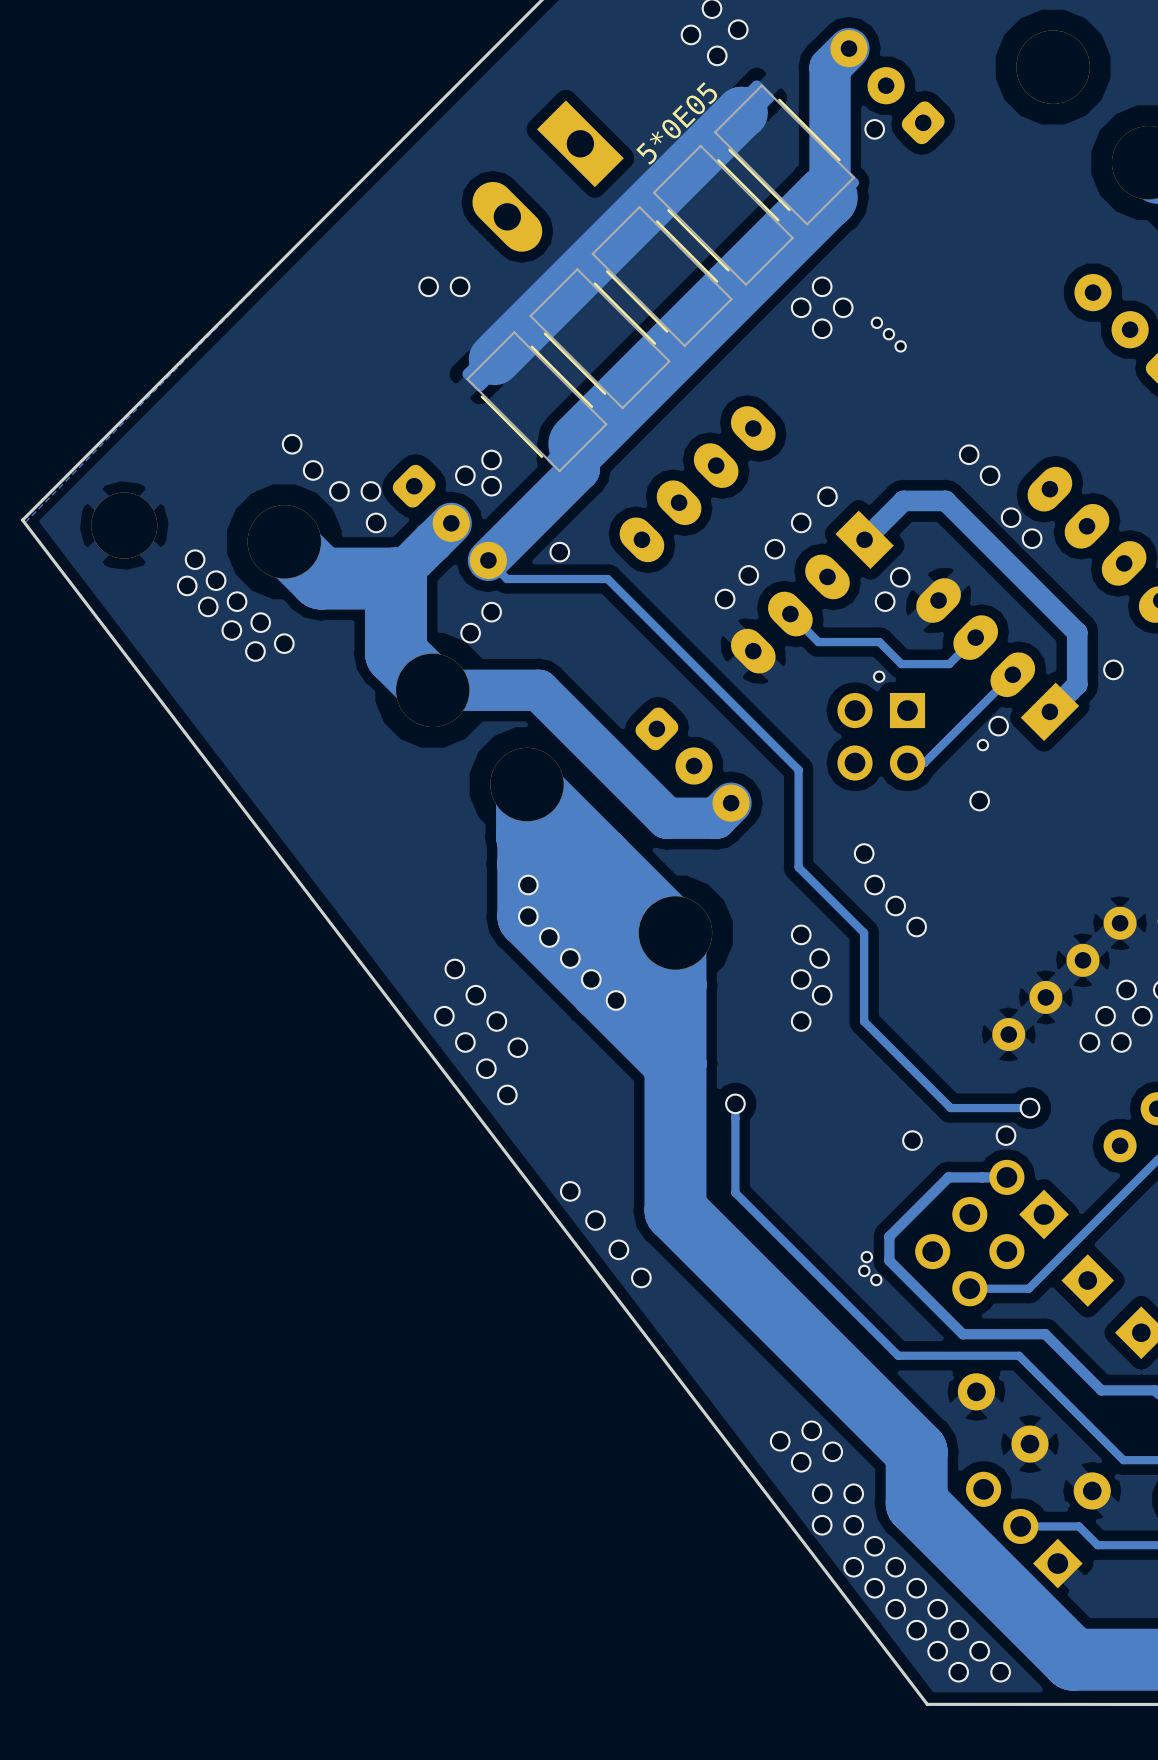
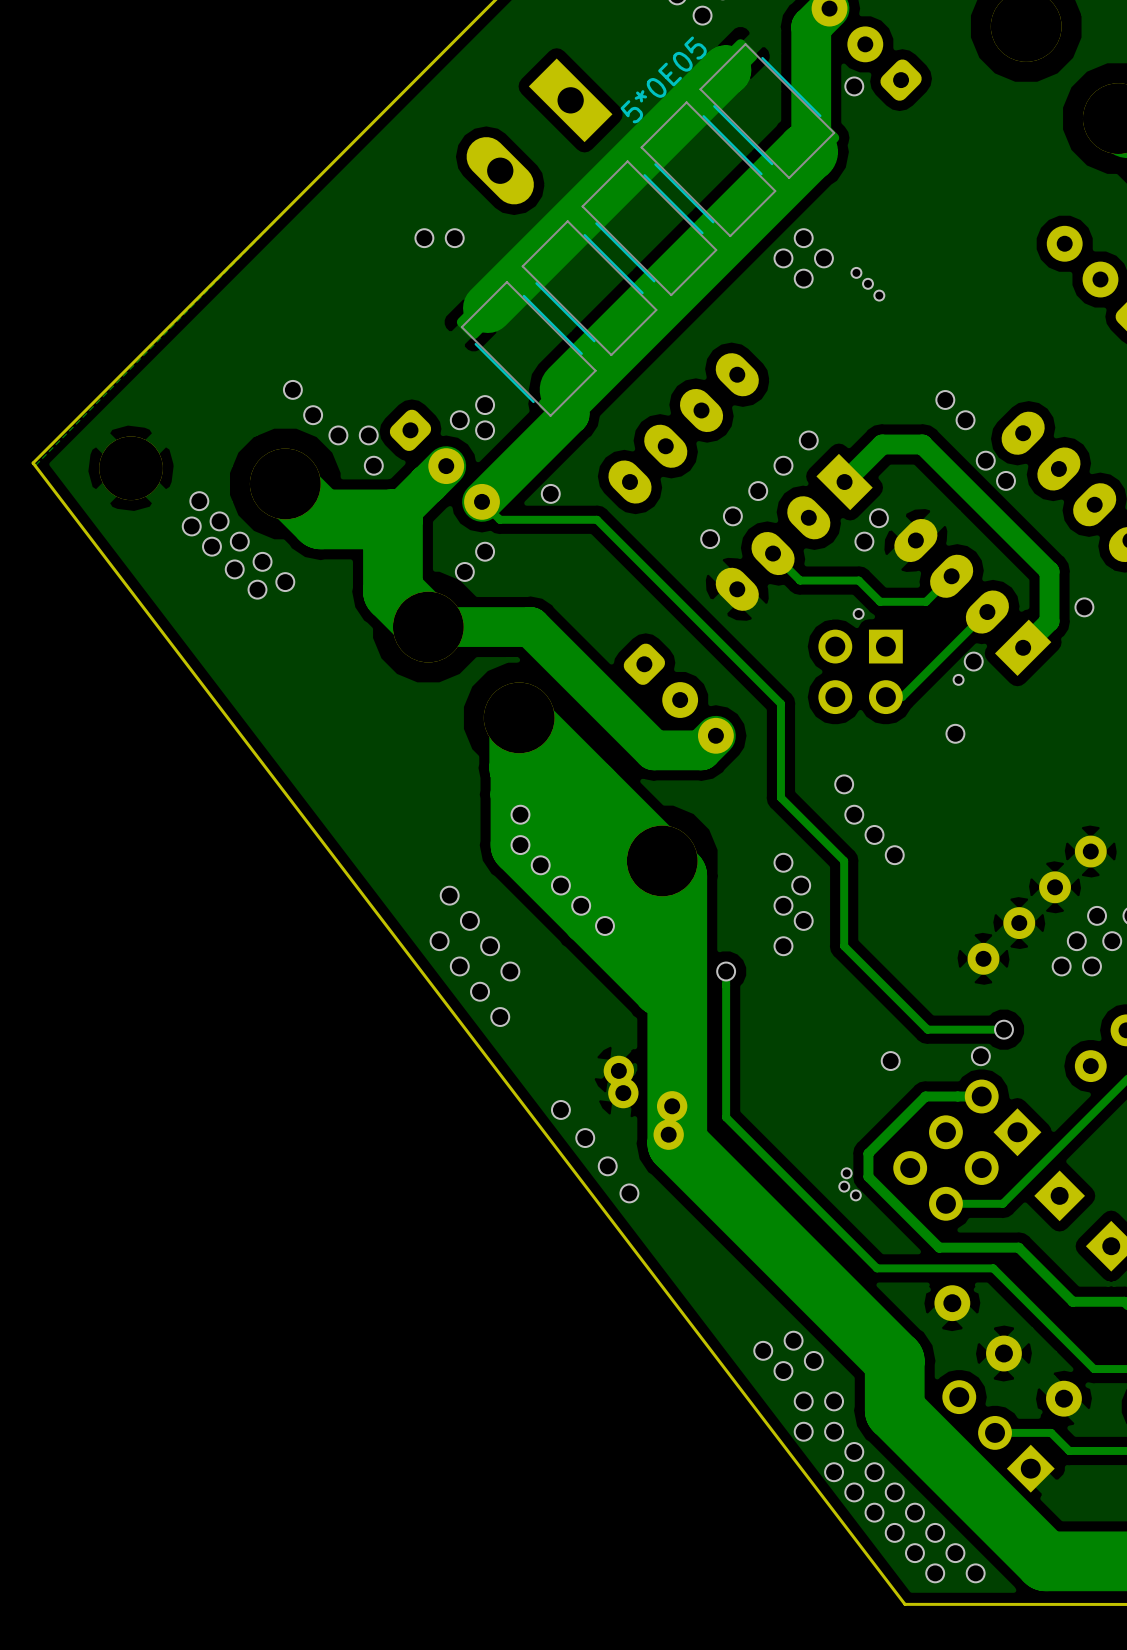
track: (675, 1063) (675, 1210) (691, 1226) -> (662, 860) (677, 875) (677, 1143)
track: (735, 1103) (735, 1192) (741, 1199) -> (726, 971) (726, 1117)
via position: (735, 1103) -> (726, 971)
part: none -> (645, 1102)

